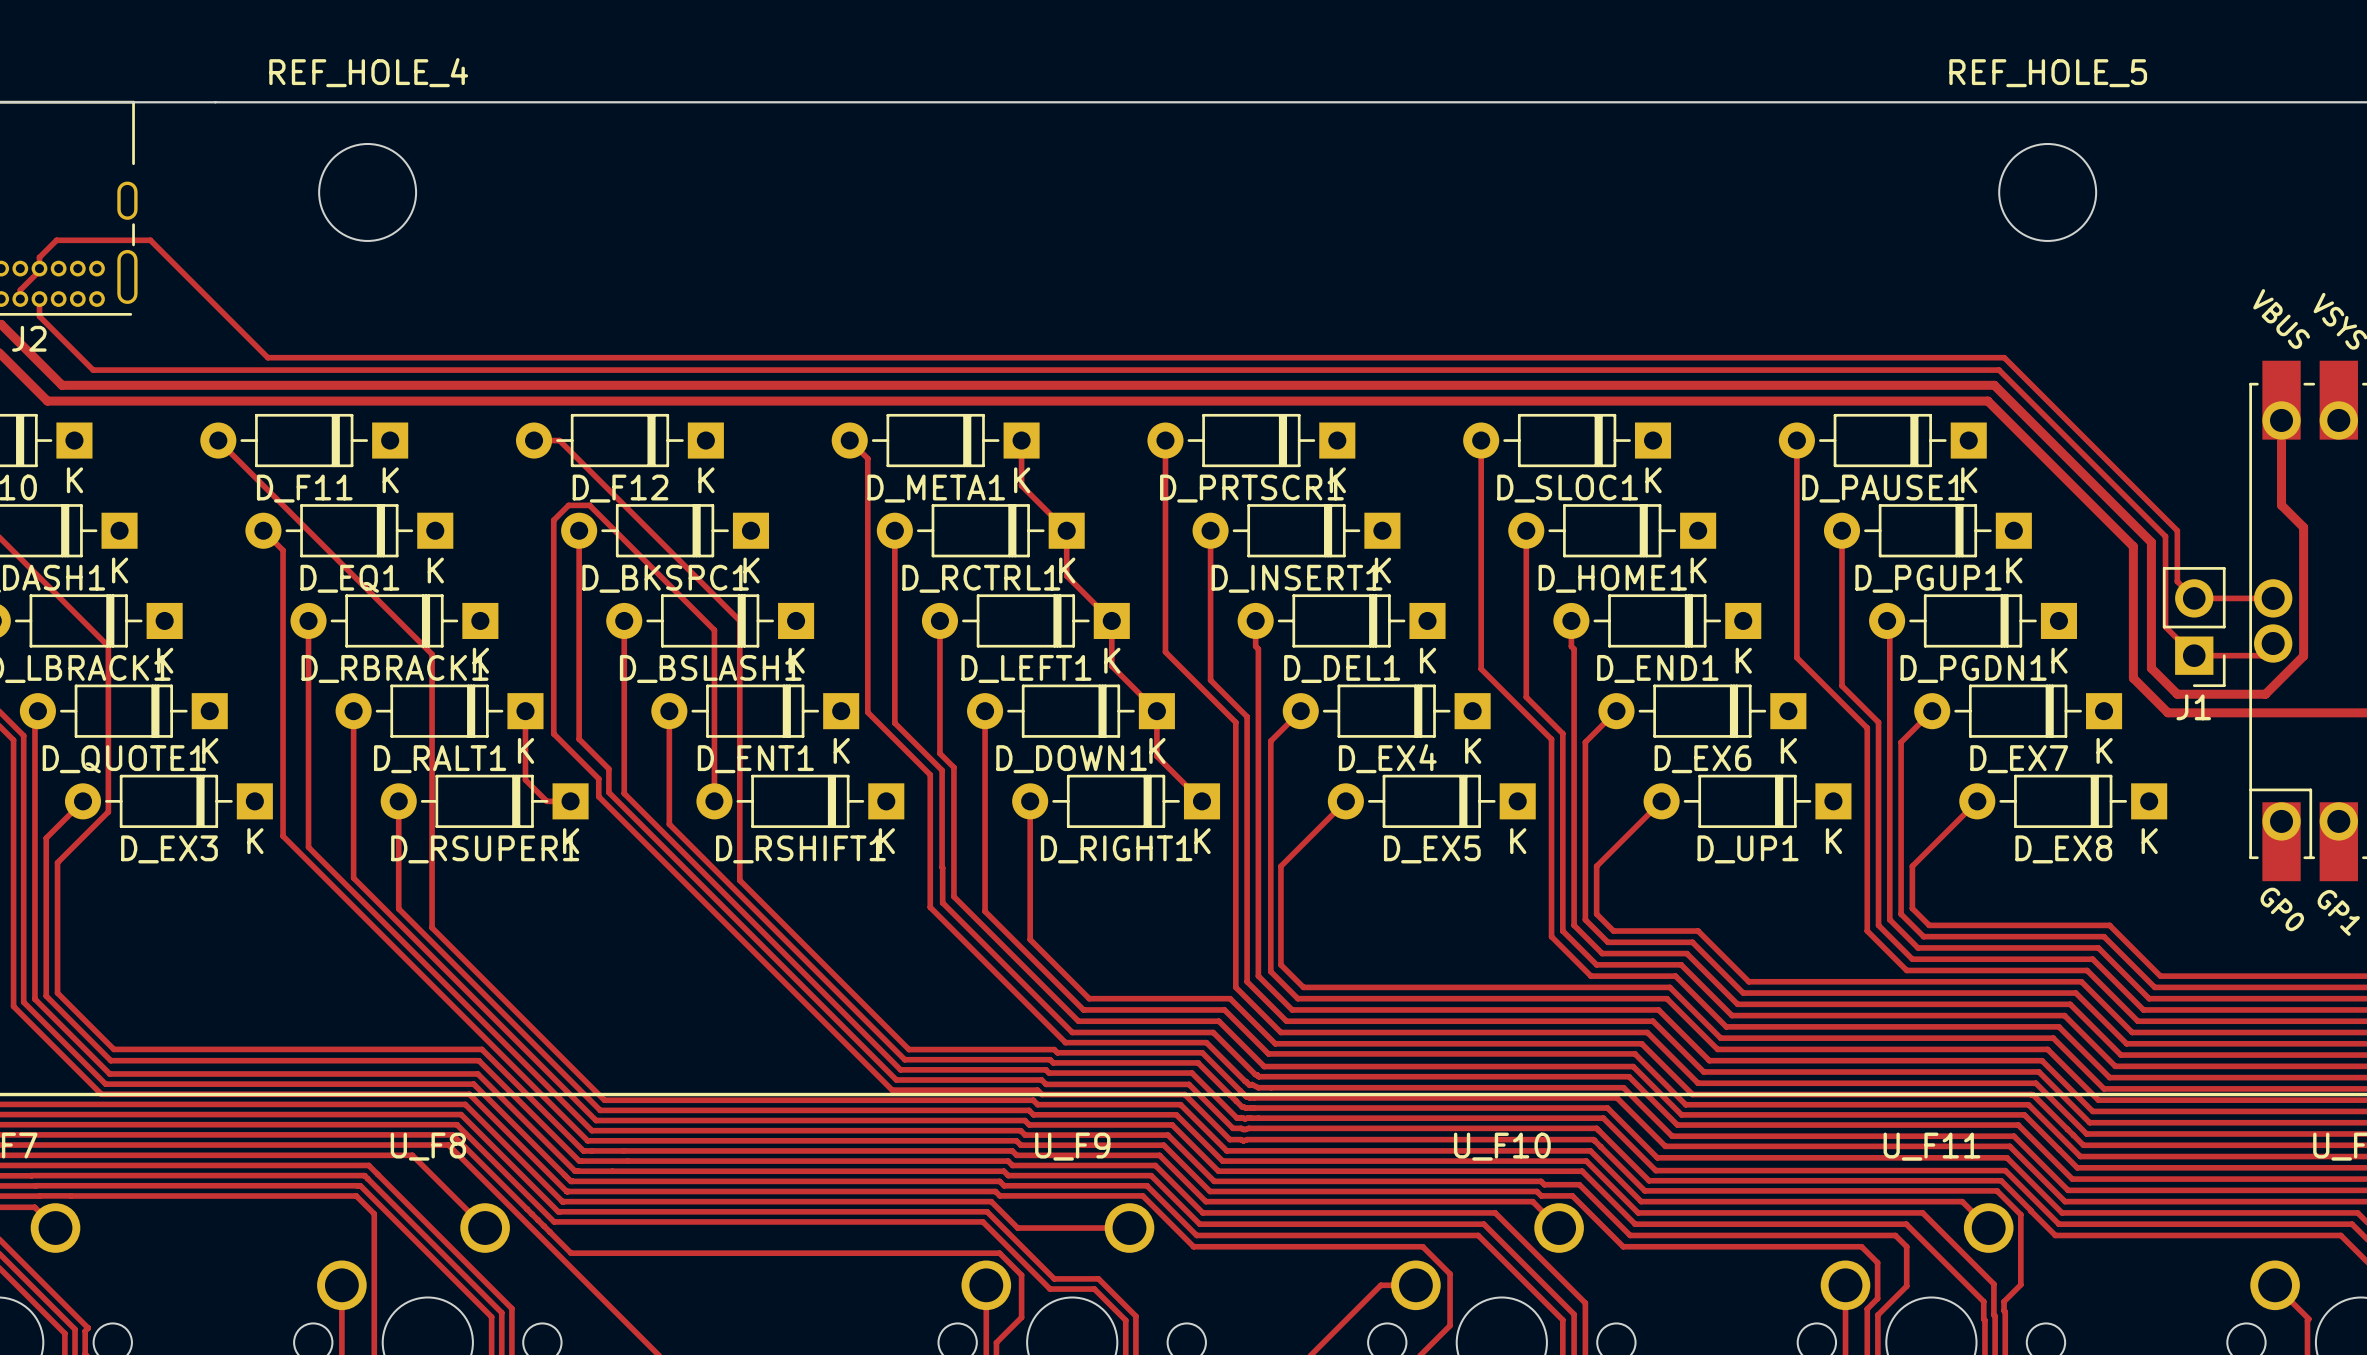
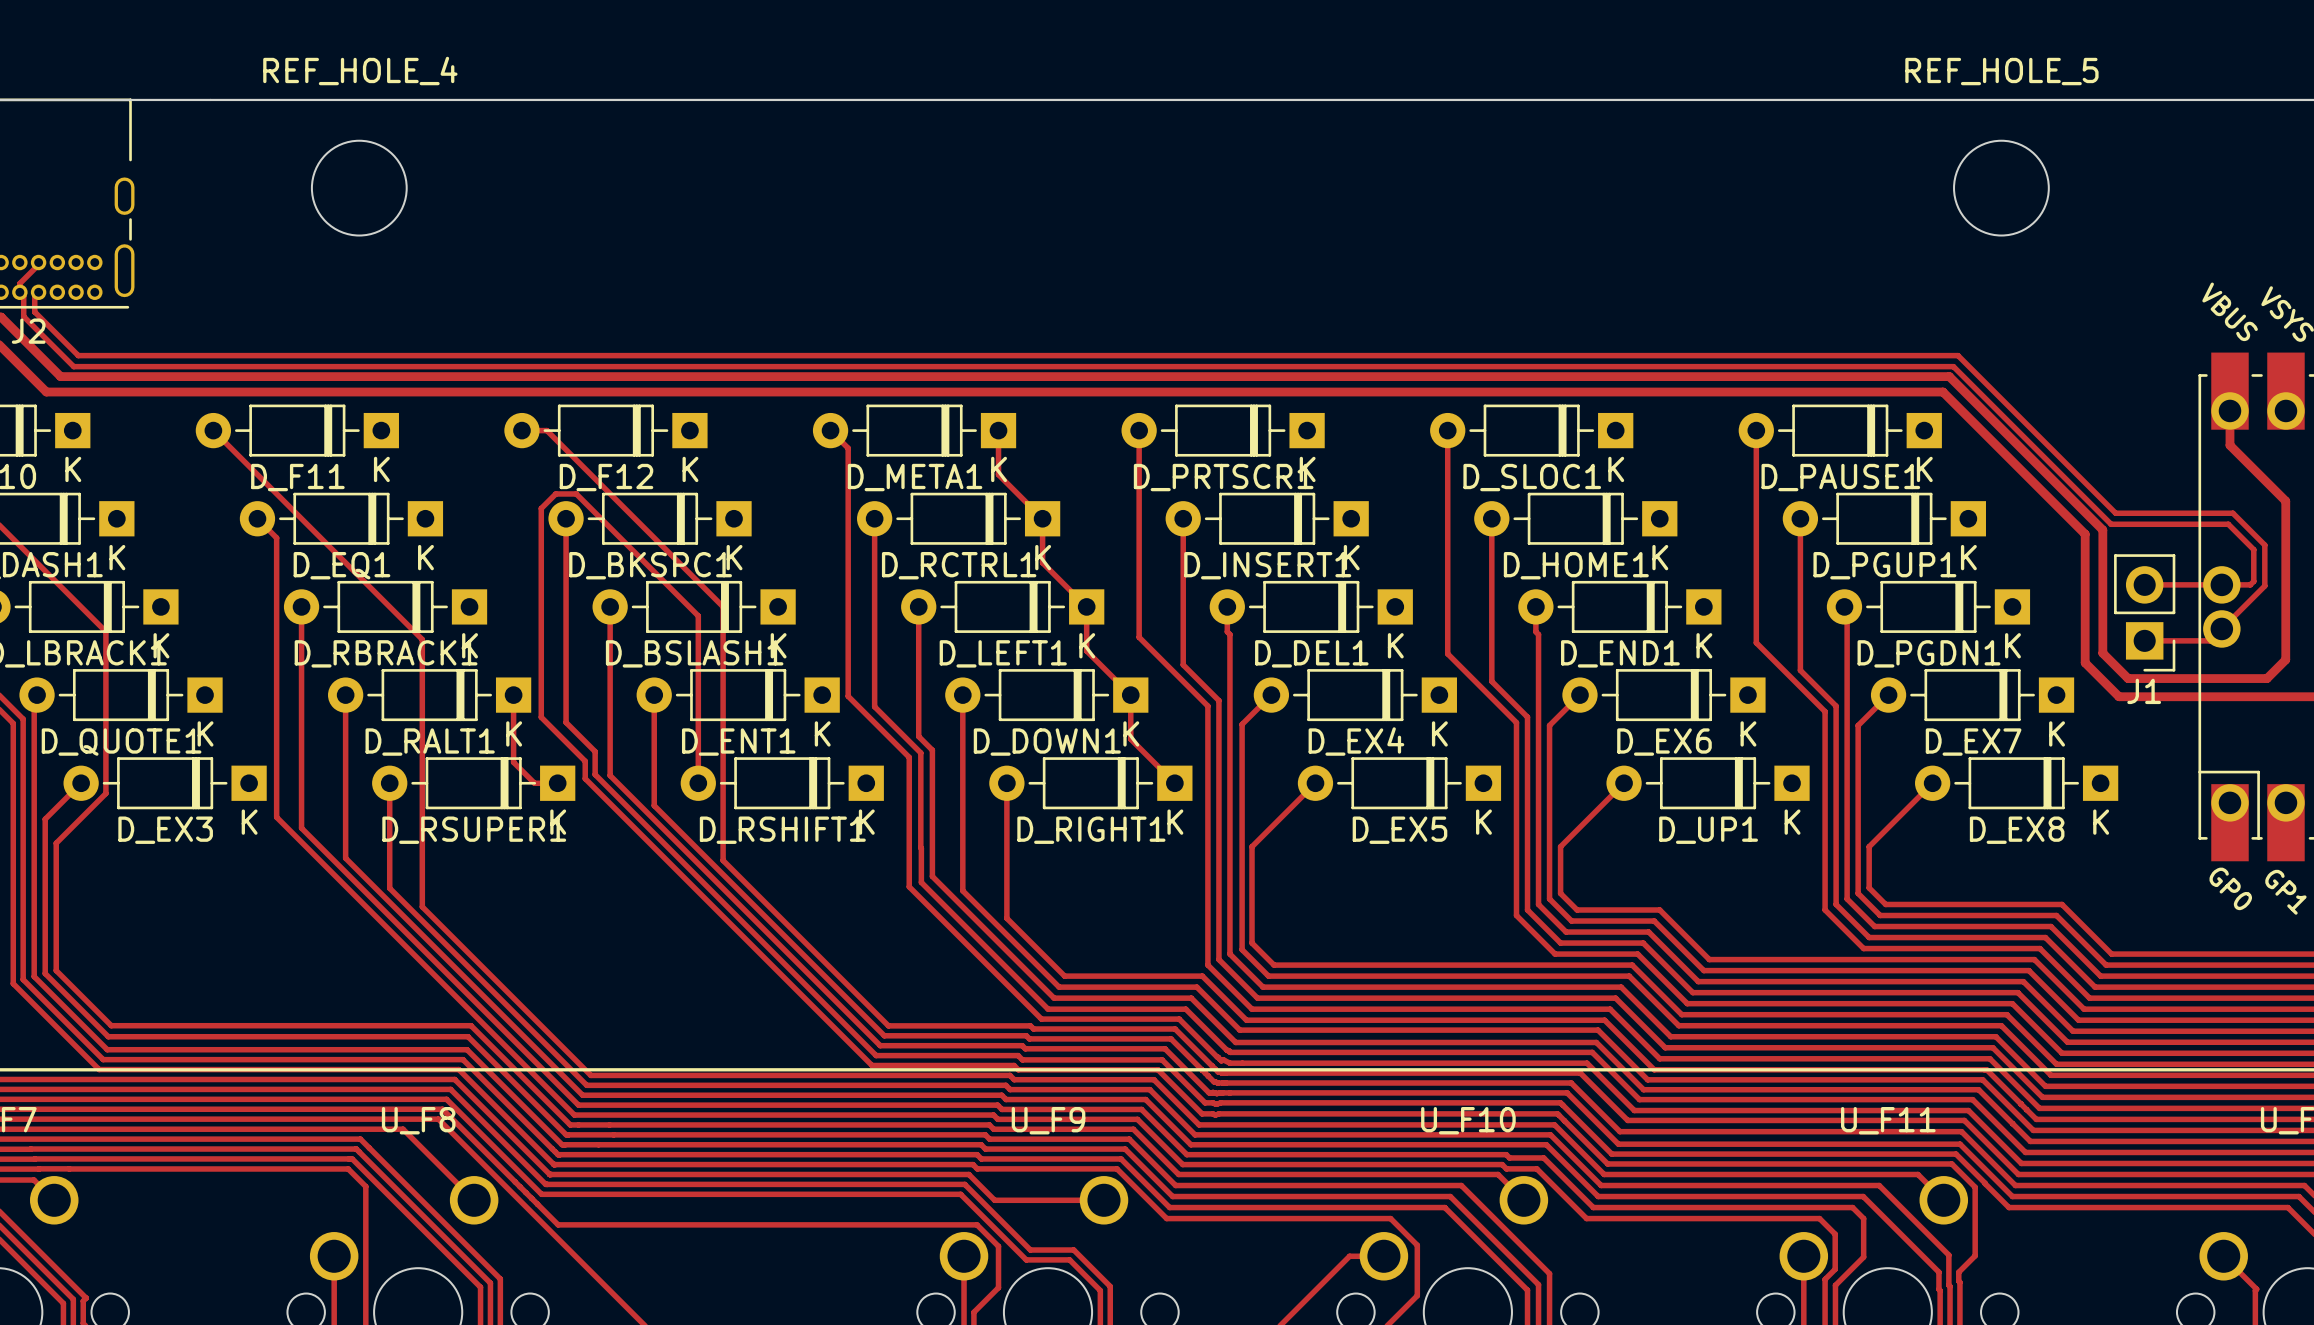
track: (39, 268) (39, 257) (56, 240) (150, 240) (267, 357) (2004, 357) (2177, 530) (2177, 581) (2194, 598) -> none
track: none -> (19, 292) (23, 296) (23, 316) (73, 366) (1953, 366) (2111, 524) (2228, 524) (2253, 549) (2253, 581) (2250, 584) (2221, 584)
track: (39, 299) (39, 316) (93, 370) (1999, 370) (2165, 536) (2165, 626) (2194, 655) -> (38, 292) (34, 296) (34, 312) (78, 355) (1958, 355) (2115, 513) (2232, 513) (2264, 545) (2264, 585) (2221, 628)
track: (2281, 455) (2281, 505) (2303, 527) (2303, 656) (2265, 694) -> (2229, 445) (2285, 501) (2285, 659) (2267, 678) (2214, 678)

